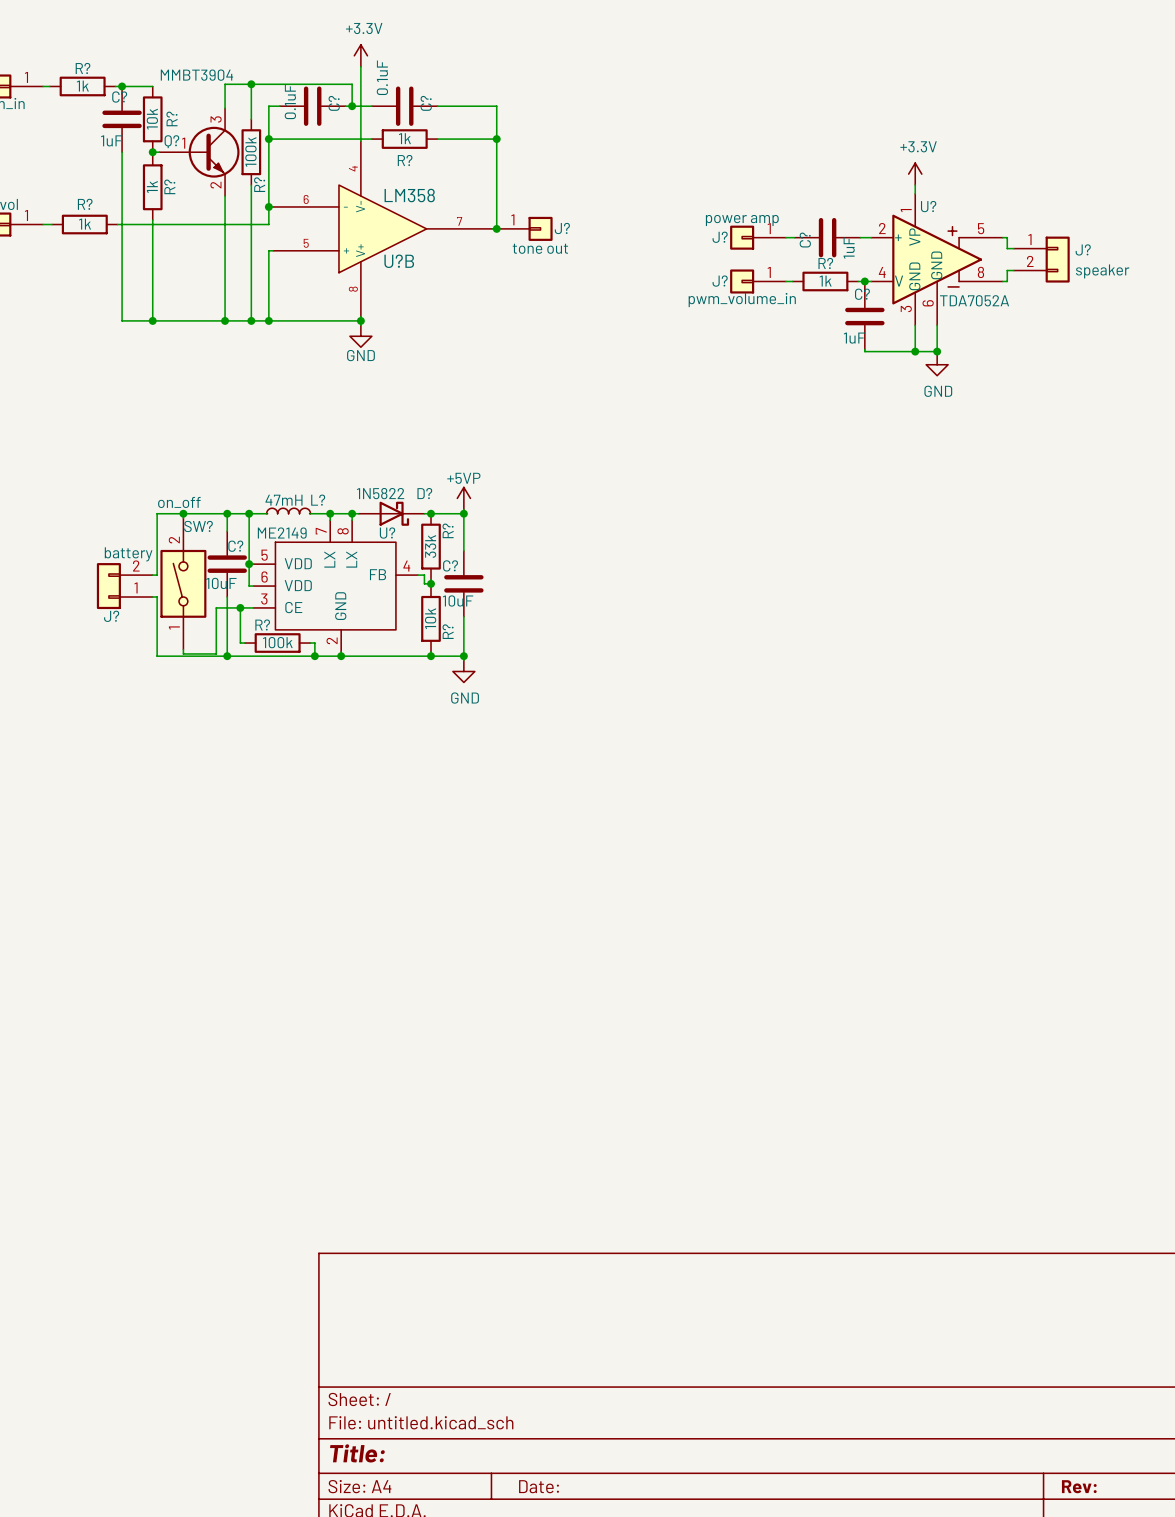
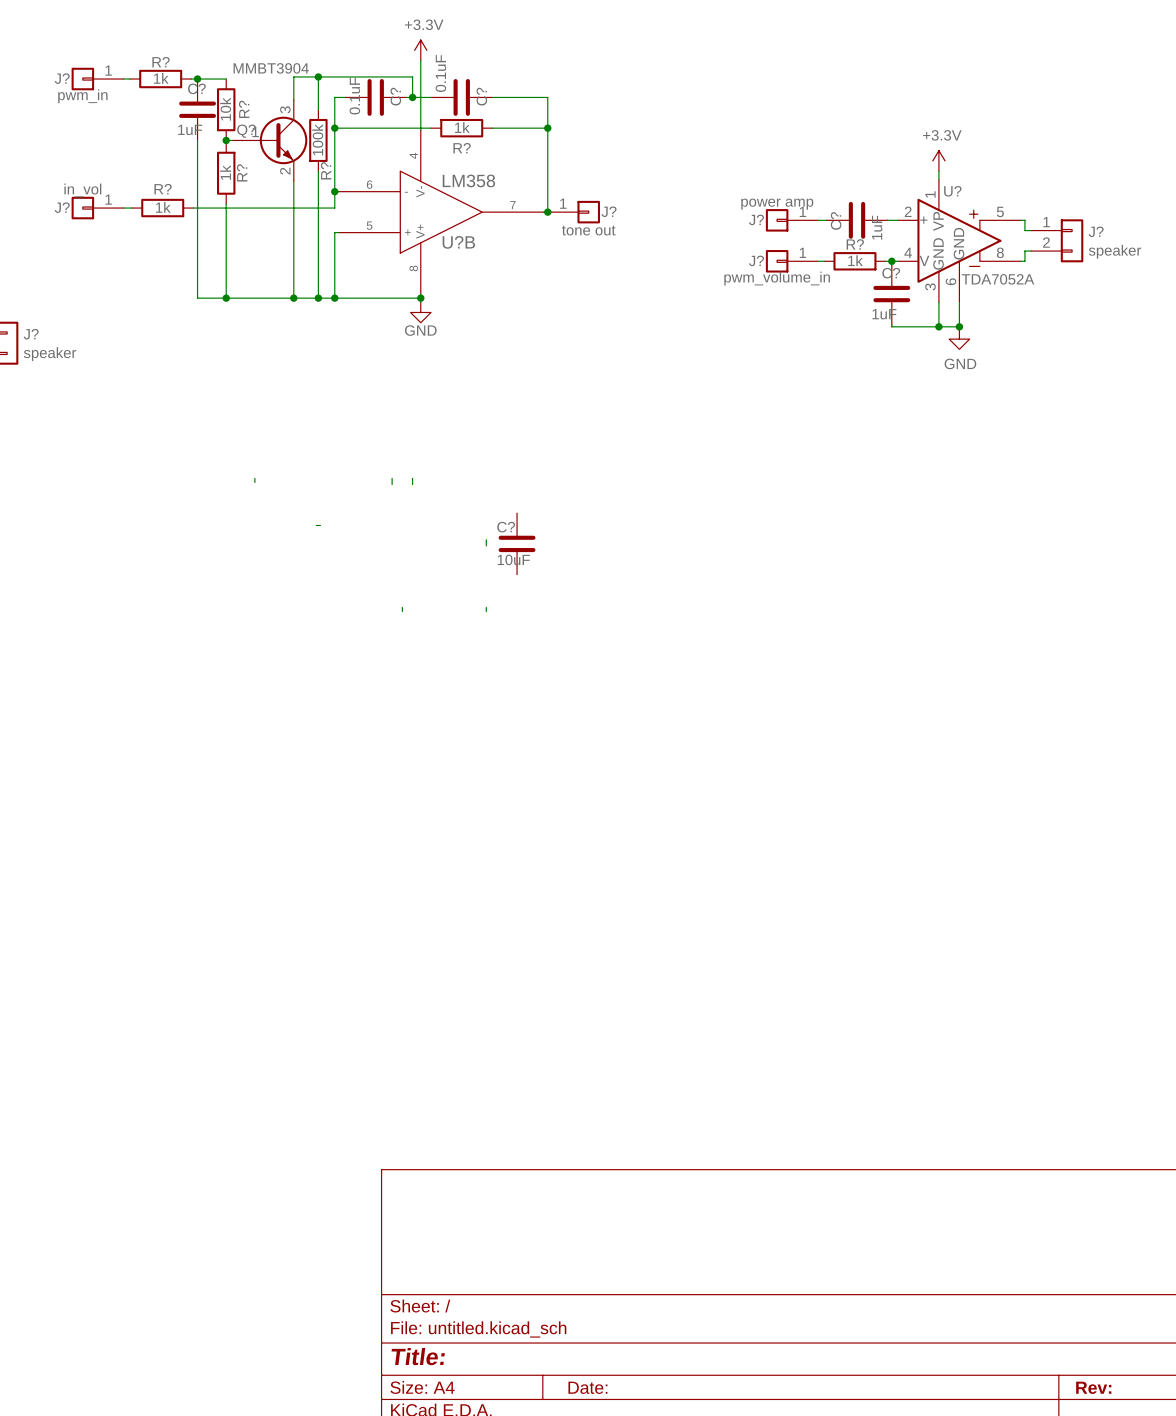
power symbol: +5VP (463, 498) -> none
wire: (463, 509) (463, 550) -> none
L?: 47mH (288, 511) -> none
junction: (183, 513) -> none
wire: (227, 513) (227, 531) -> none
junction: (227, 513) -> none
wire: (249, 513) (249, 586) (253, 586) -> none
junction: (249, 513) -> none
wire: (266, 513) (157, 513) (157, 575) (152, 575) -> none
wire: (310, 513) (358, 513) -> none
junction: (330, 513) -> none
junction: (352, 513) -> none
D?: 1N5822 (391, 513) -> none
wire: (424, 513) (463, 513) -> none
junction: (431, 513) -> none
junction: (463, 513) -> none
R?: 33k (431, 546) -> none
C?: 10uF (227, 564) -> none
junction: (249, 564) -> none
wire: (417, 575) (424, 575) (424, 583) (431, 583) -> none
SW?: on_off (183, 583) -> none
junction: (431, 583) -> none
J?: battery (124, 586) -> none
U?: ME2149 (335, 586) -> none
wire: (152, 597) (157, 597) (157, 656) (463, 656) -> none
wire: (227, 597) (227, 656) -> none
wire: (240, 607) (240, 643) (244, 643) -> none
junction: (240, 607) -> none
wire: (253, 607) (216, 607) (216, 653) (183, 653) (183, 649) -> none
wire: (463, 616) (463, 660) -> none
R?: 10k (431, 618) -> none
R?: 100k (277, 643) -> none
wire: (310, 643) (314, 643) (314, 656) -> none
junction: (227, 656) -> none
junction: (314, 656) -> none
junction: (341, 656) -> none
junction: (431, 656) -> none
junction: (463, 656) -> none
power symbol: GND (463, 671) -> none

